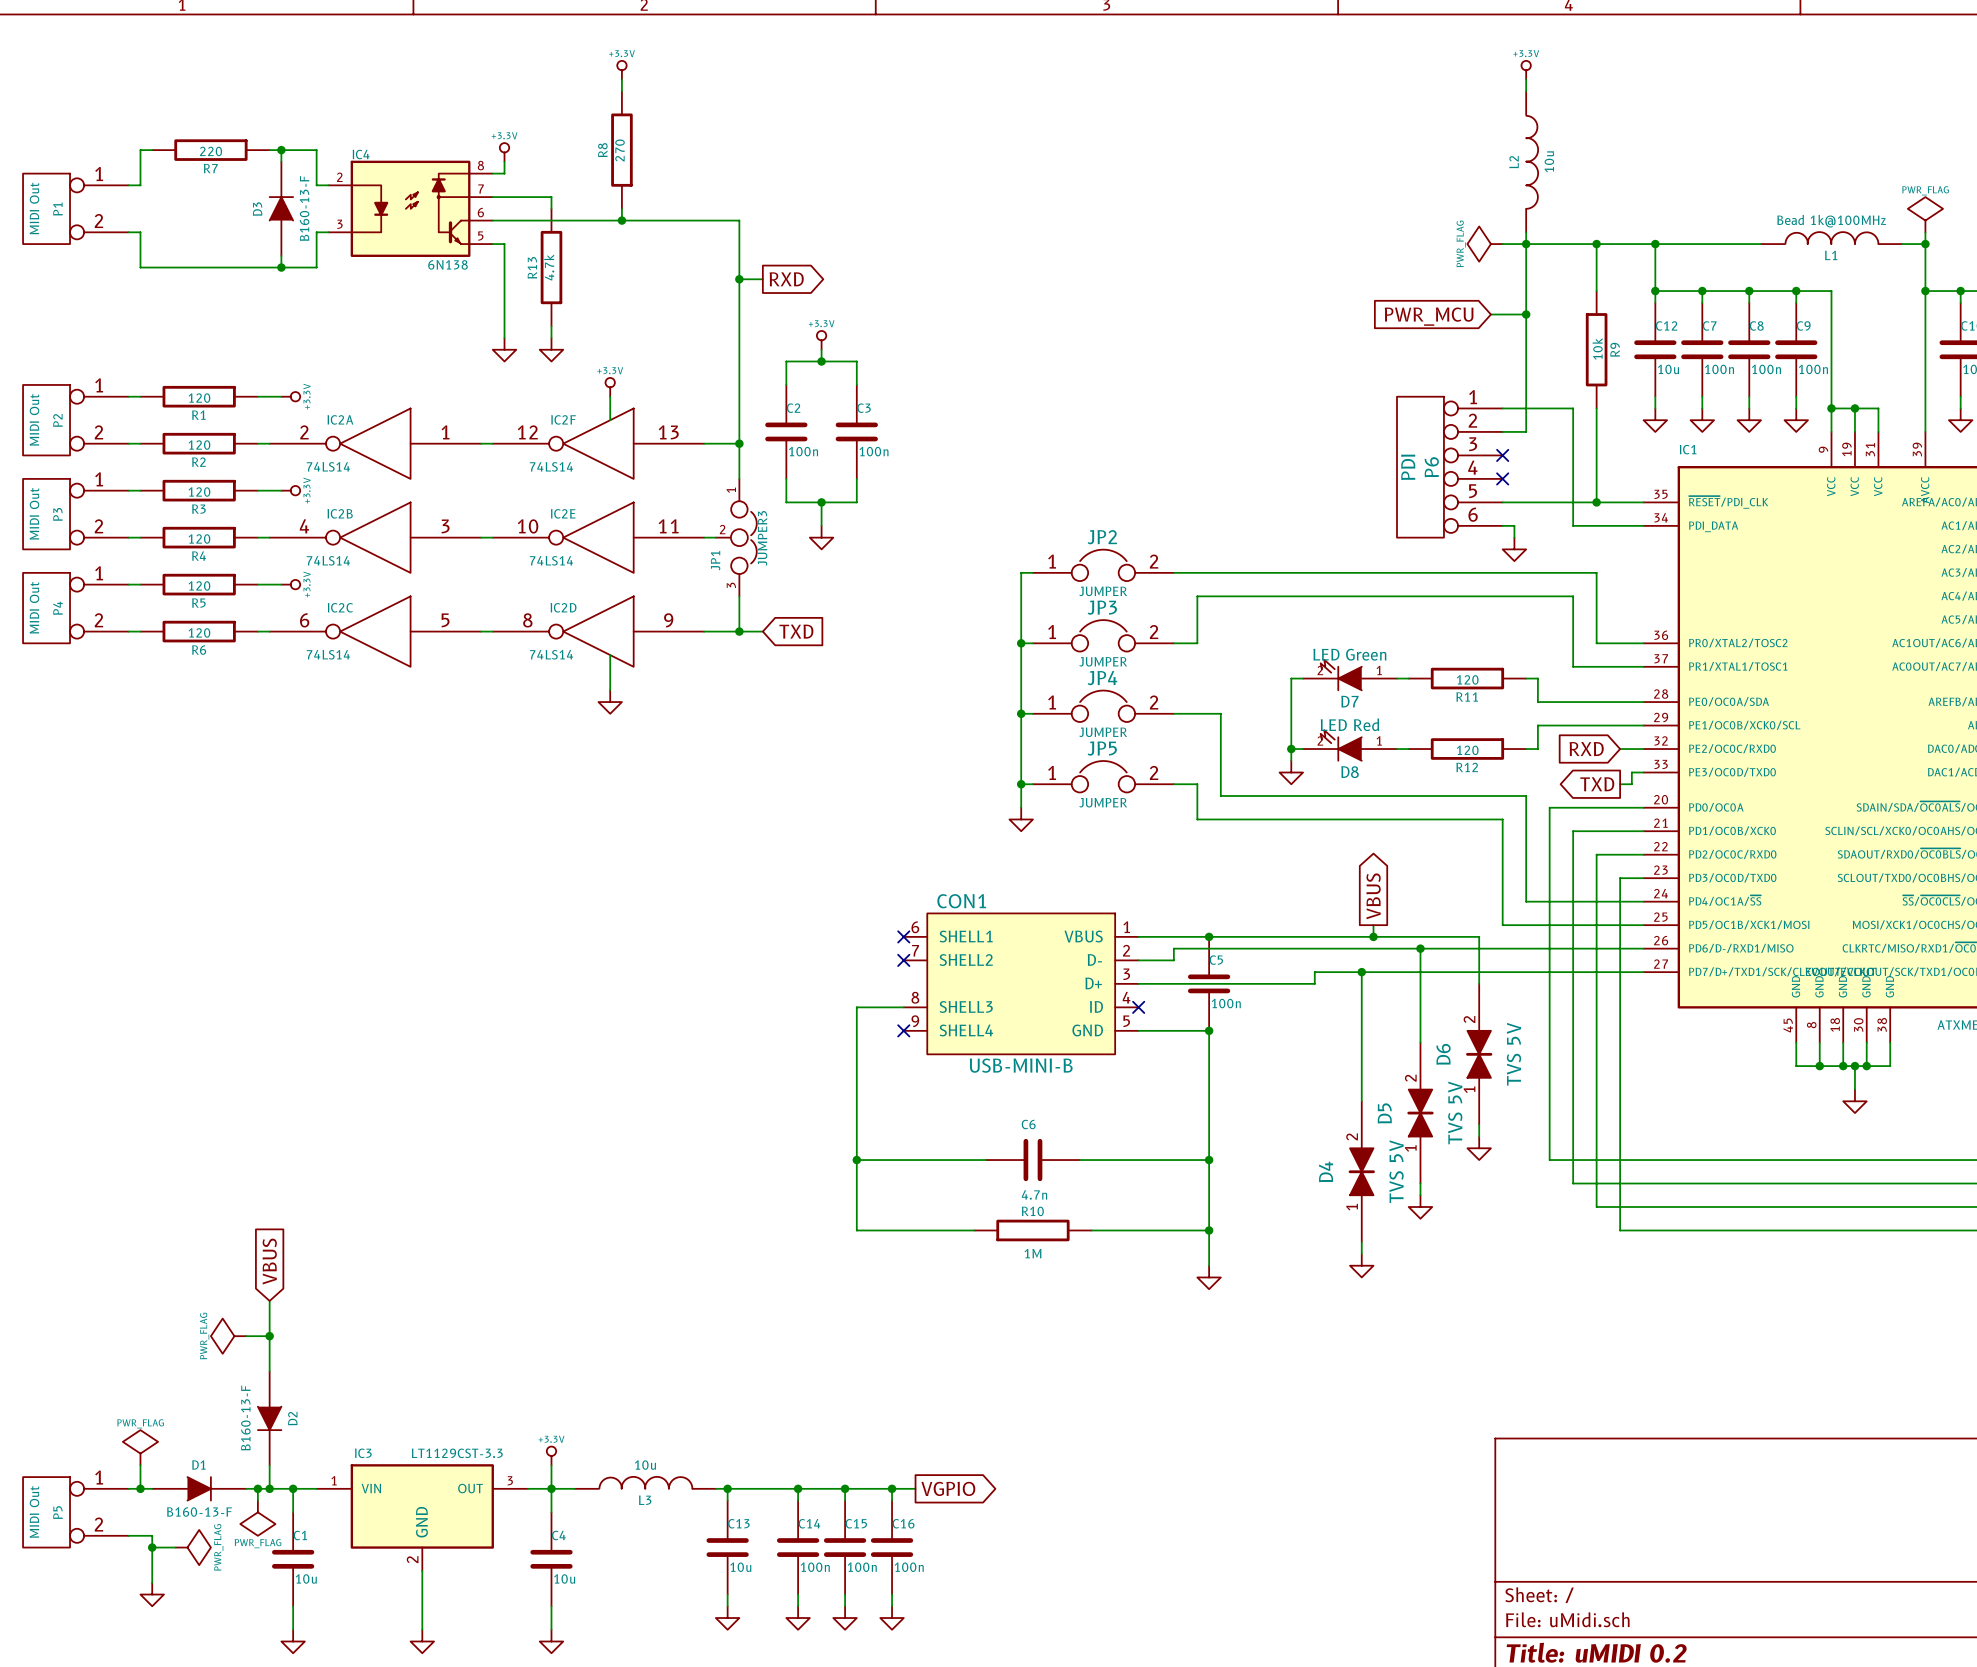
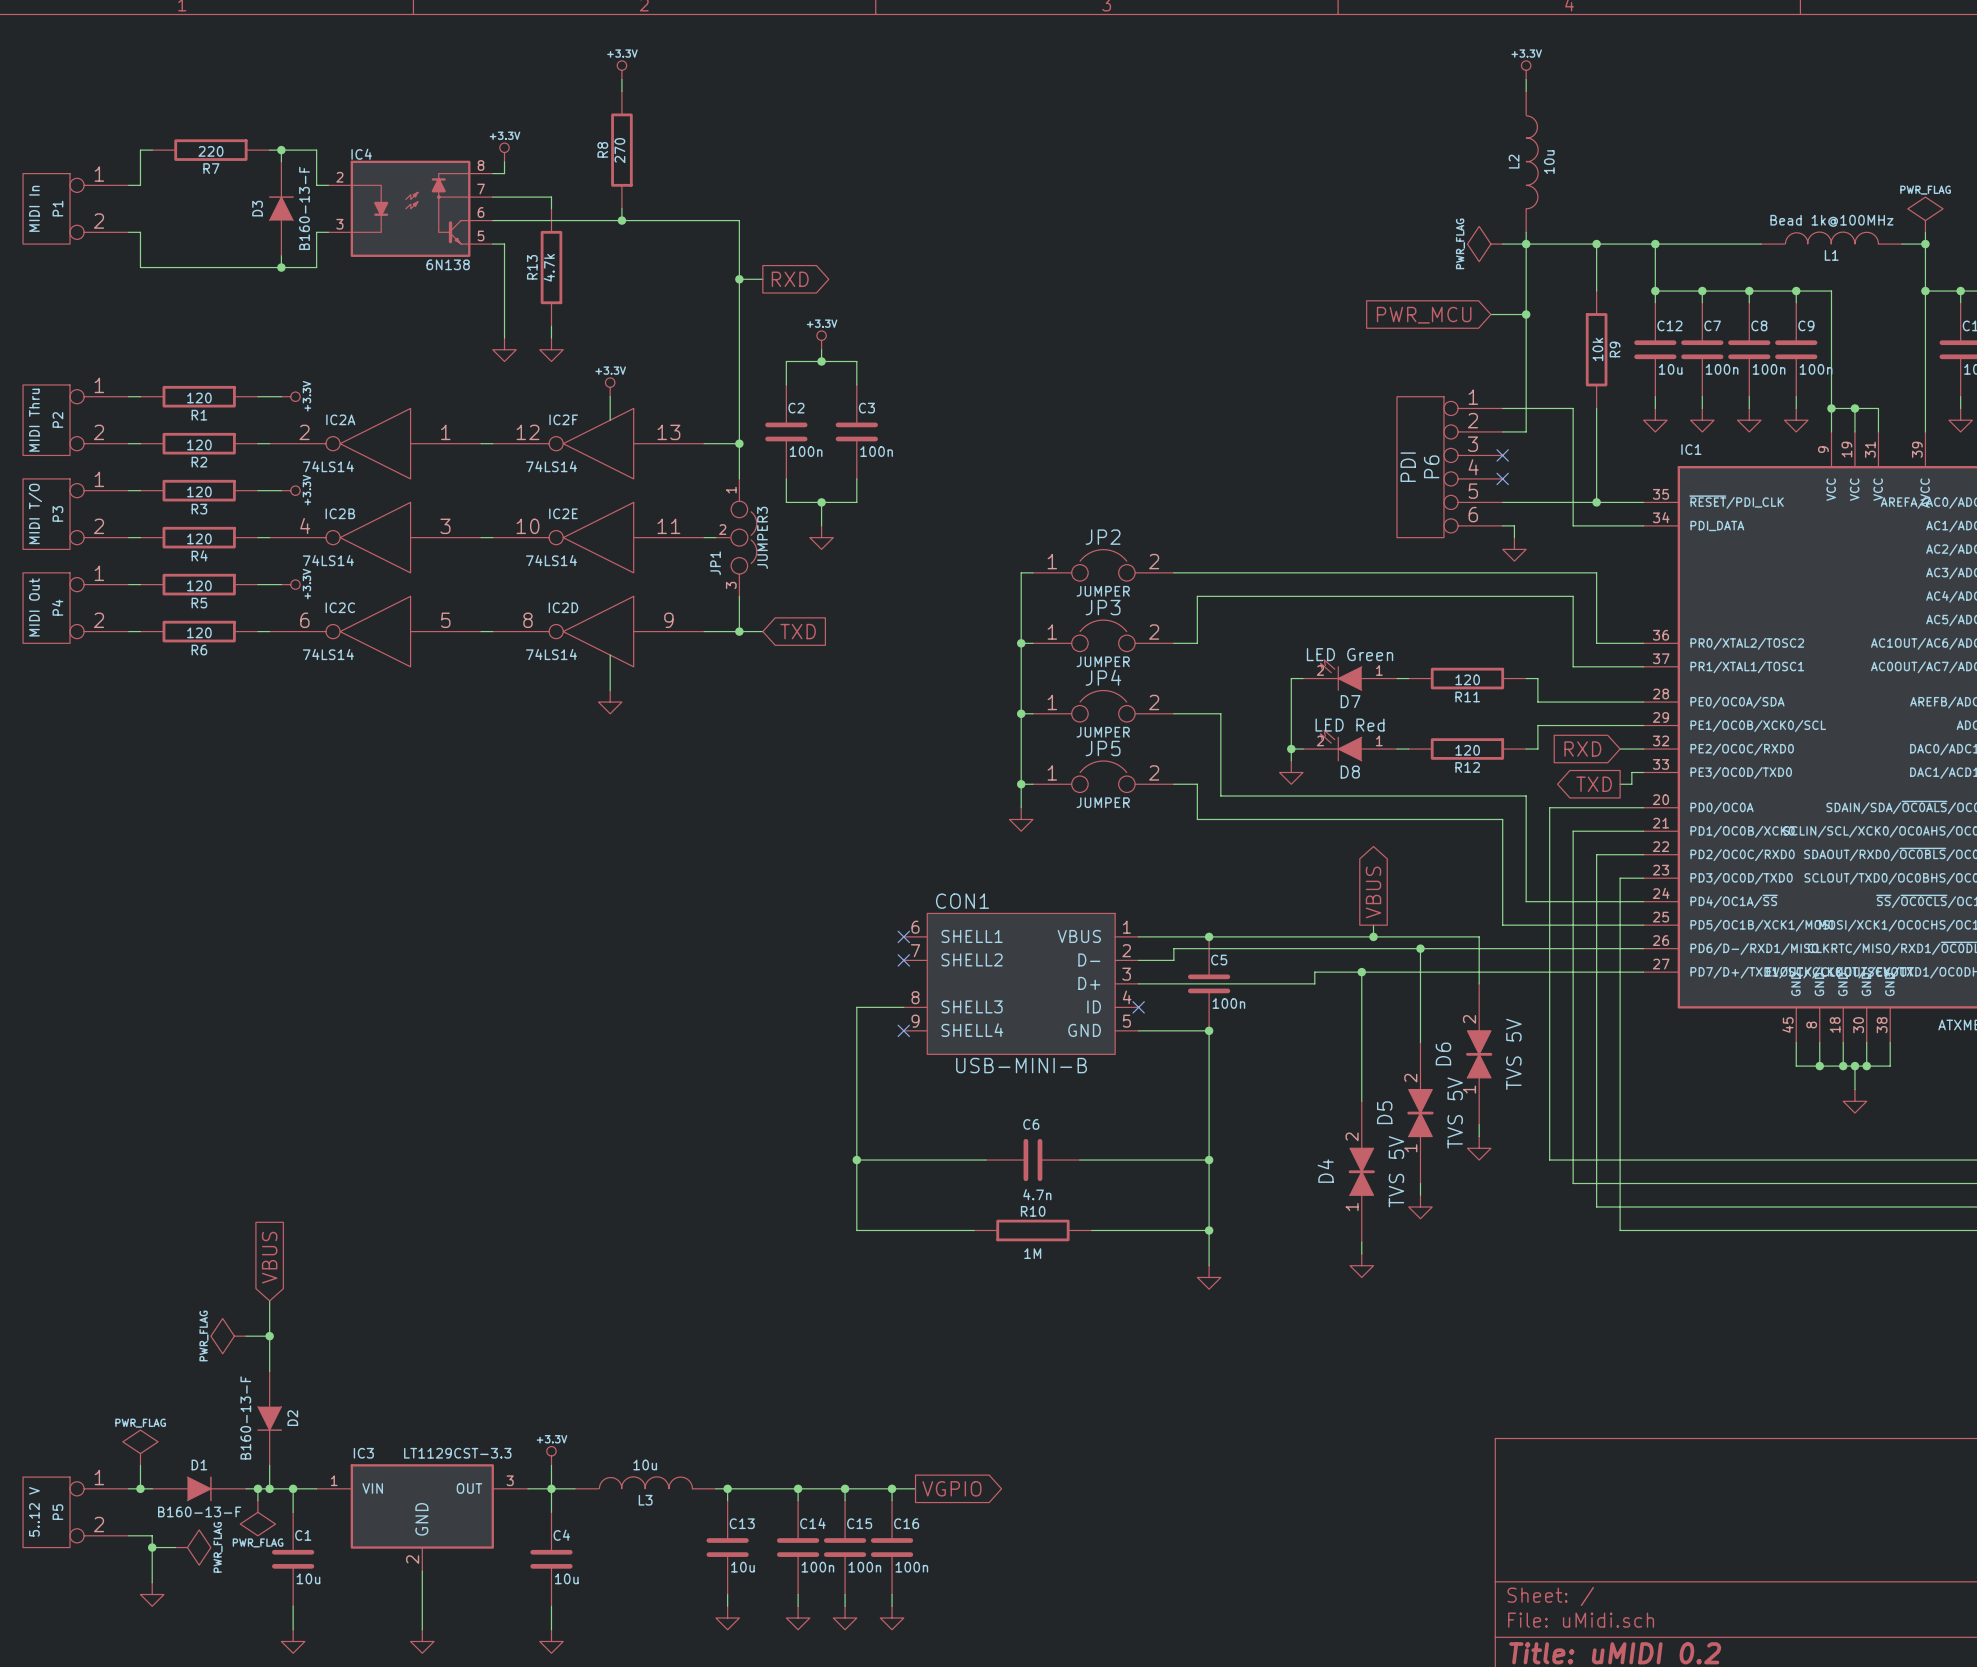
P1 value: MIDI Out (34, 208) -> MIDI In (34, 208)
P2 value: MIDI Out (34, 419) -> MIDI Thru (34, 420)
P3 value: MIDI Out (34, 513) -> MIDI T/O (35, 513)
P5 value: MIDI Out (34, 1512) -> 5..12 V (34, 1511)

